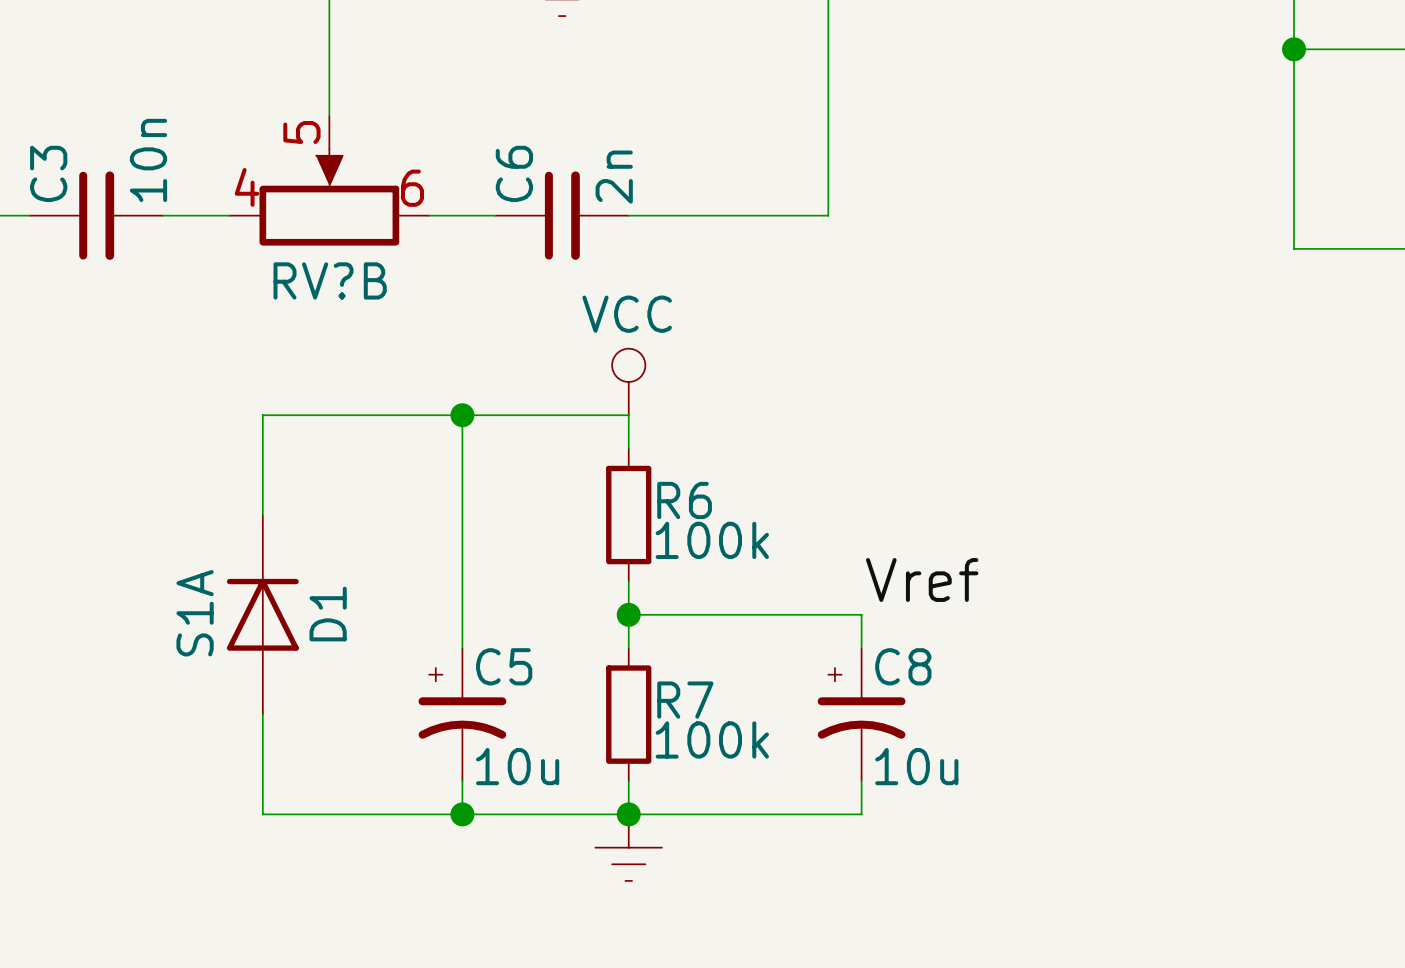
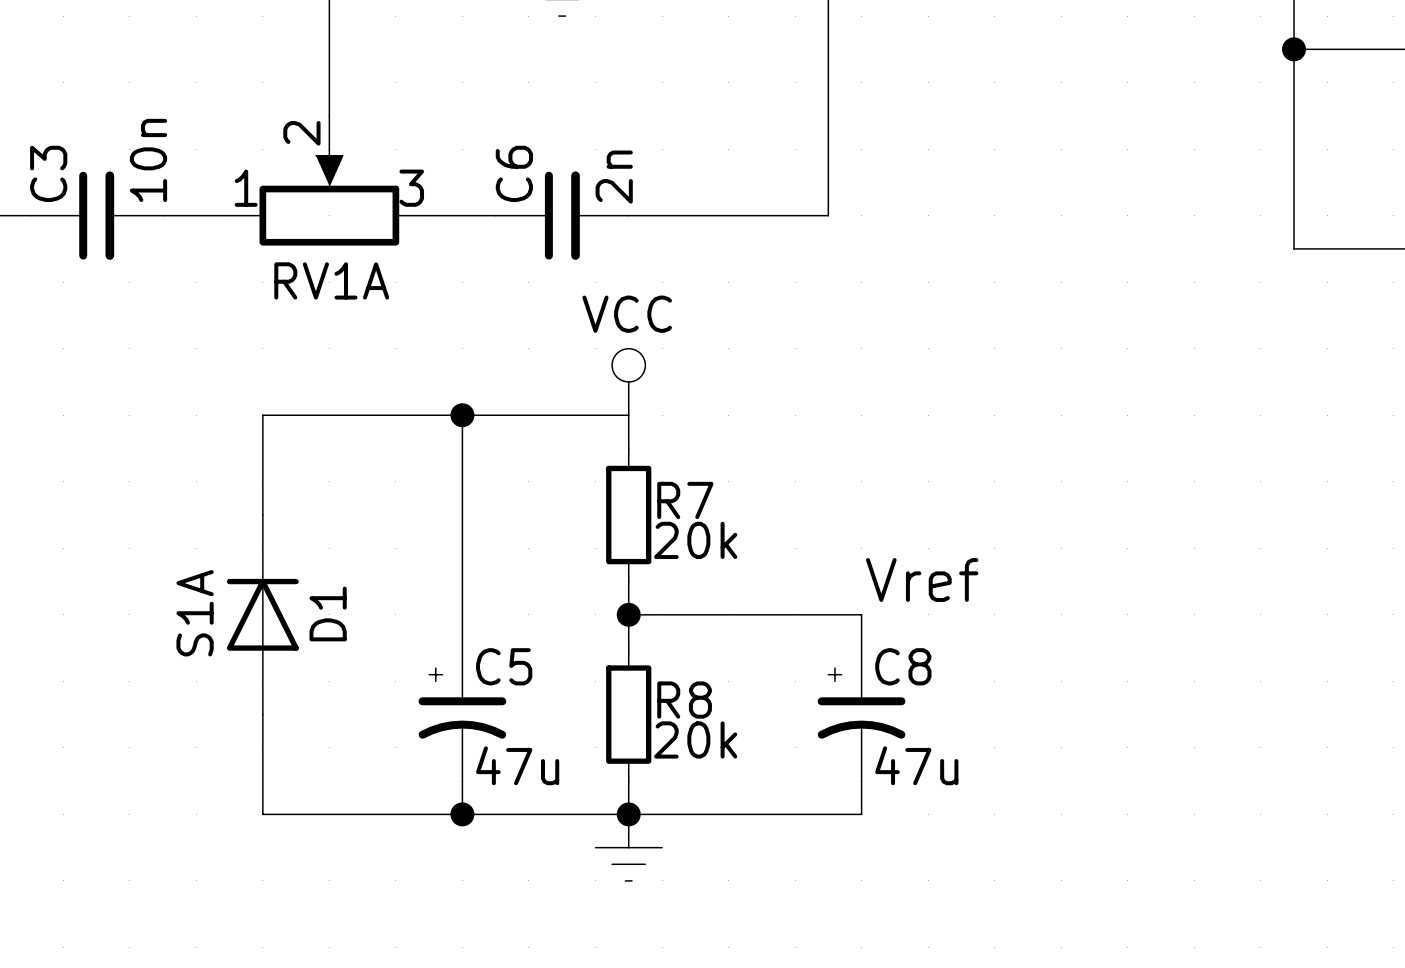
RV?B pin number: 5 (301, 132) -> 2 (301, 133)
RV?B pin number: 4 (246, 187) -> 1 (246, 188)
RV?B pin number: 6 (412, 188) -> 3 (411, 188)
RV?B name: RV?B (330, 280) -> RV1A (331, 280)
R6 name: R6 (684, 500) -> R7 (685, 500)
R6 value: 100k (712, 540) -> 20k (695, 540)
R7 name: R7 (685, 700) -> R8 (684, 700)
R7 value: 100k (712, 739) -> 20k (695, 739)
C5 value: 10u (517, 766) -> 47u (517, 765)
C8 value: 10u (916, 766) -> 47u (916, 765)

